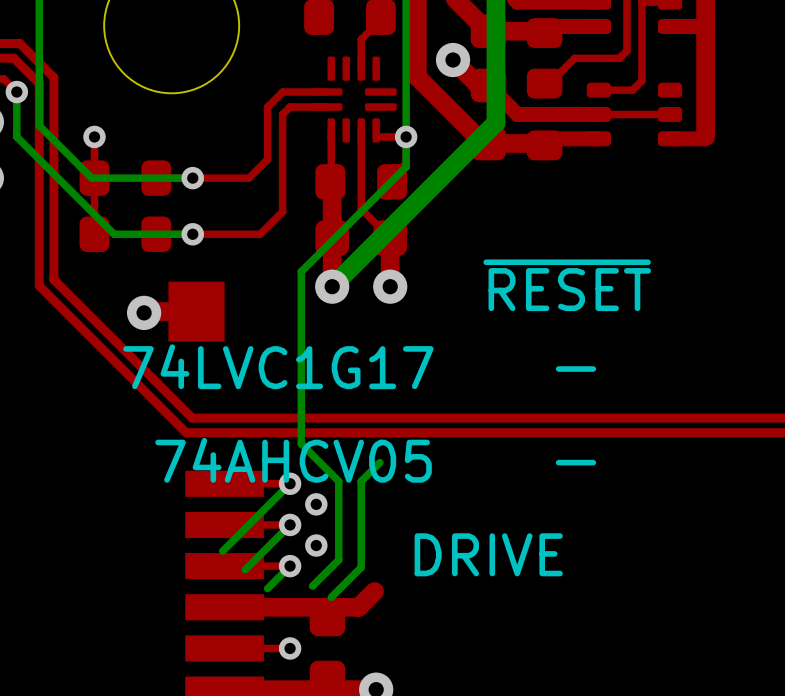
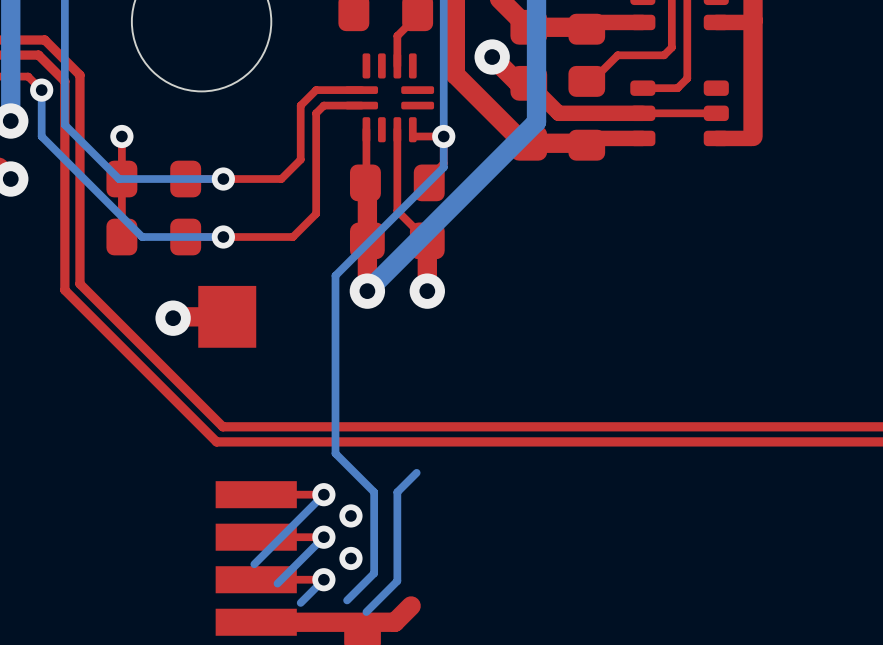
text: ~{RESET} (567, 285) -> none
text: 74LVC1G17 (278, 366) -> none
line: (593, 369) (558, 369) -> none
text: 74AHCV05 (293, 460) -> none
line: (593, 462) (558, 462) -> none
text: DRIVE (488, 554) -> none

